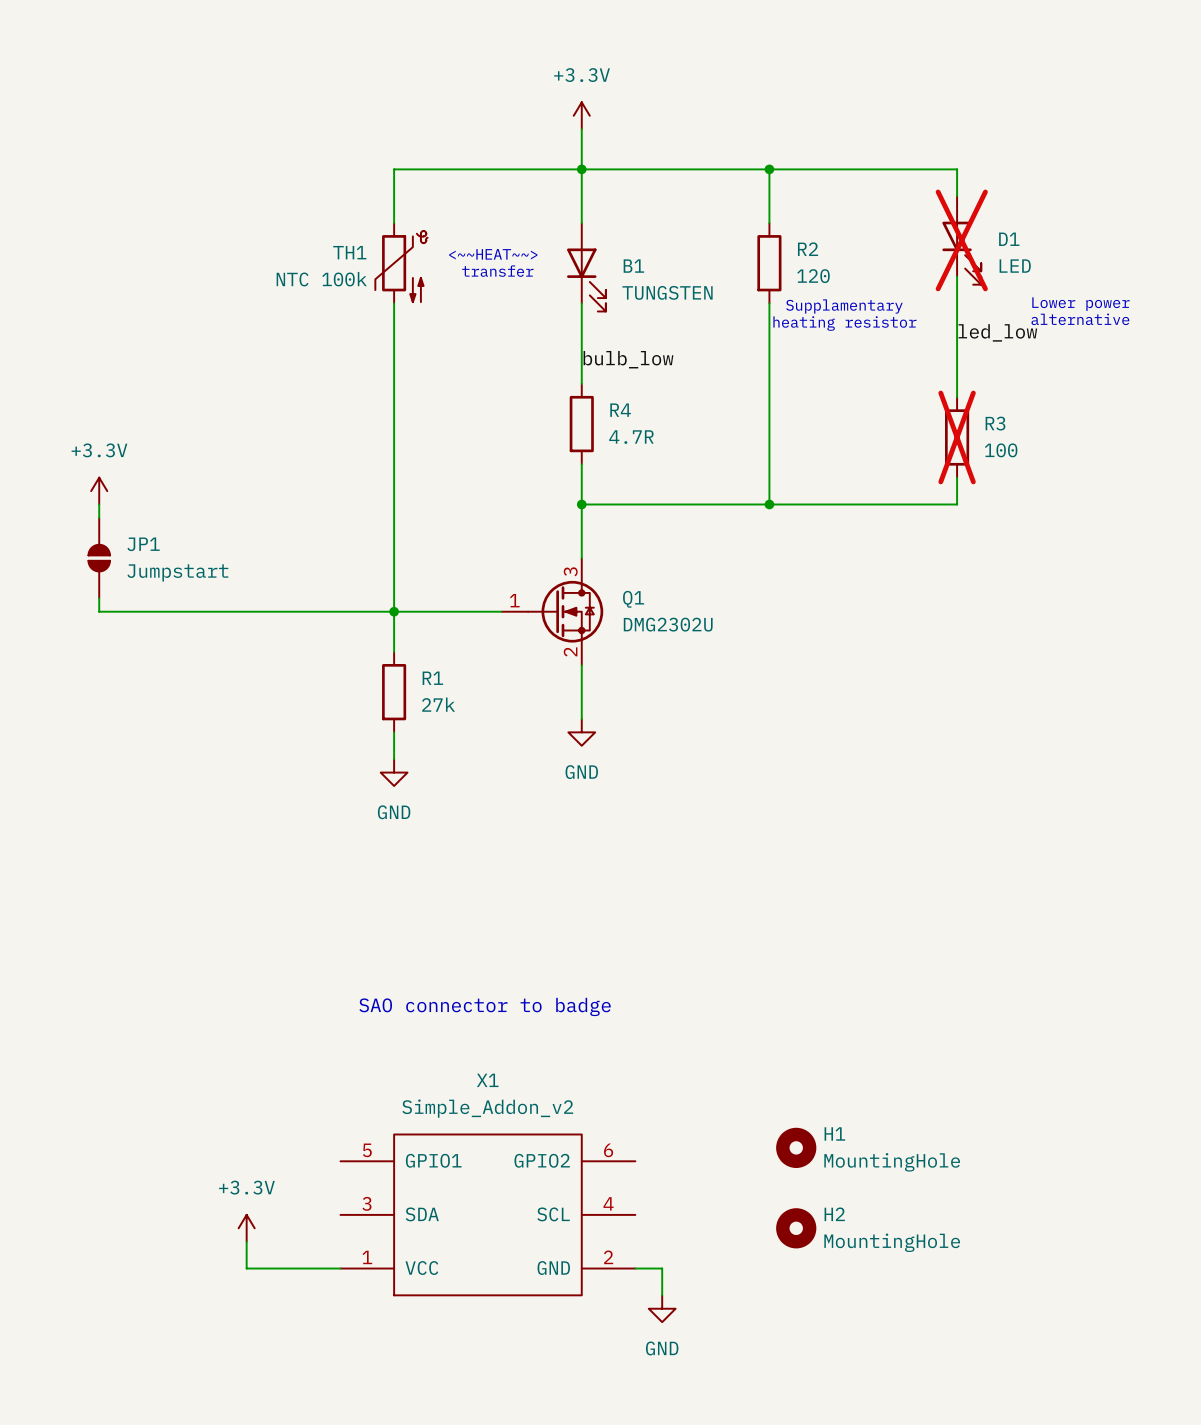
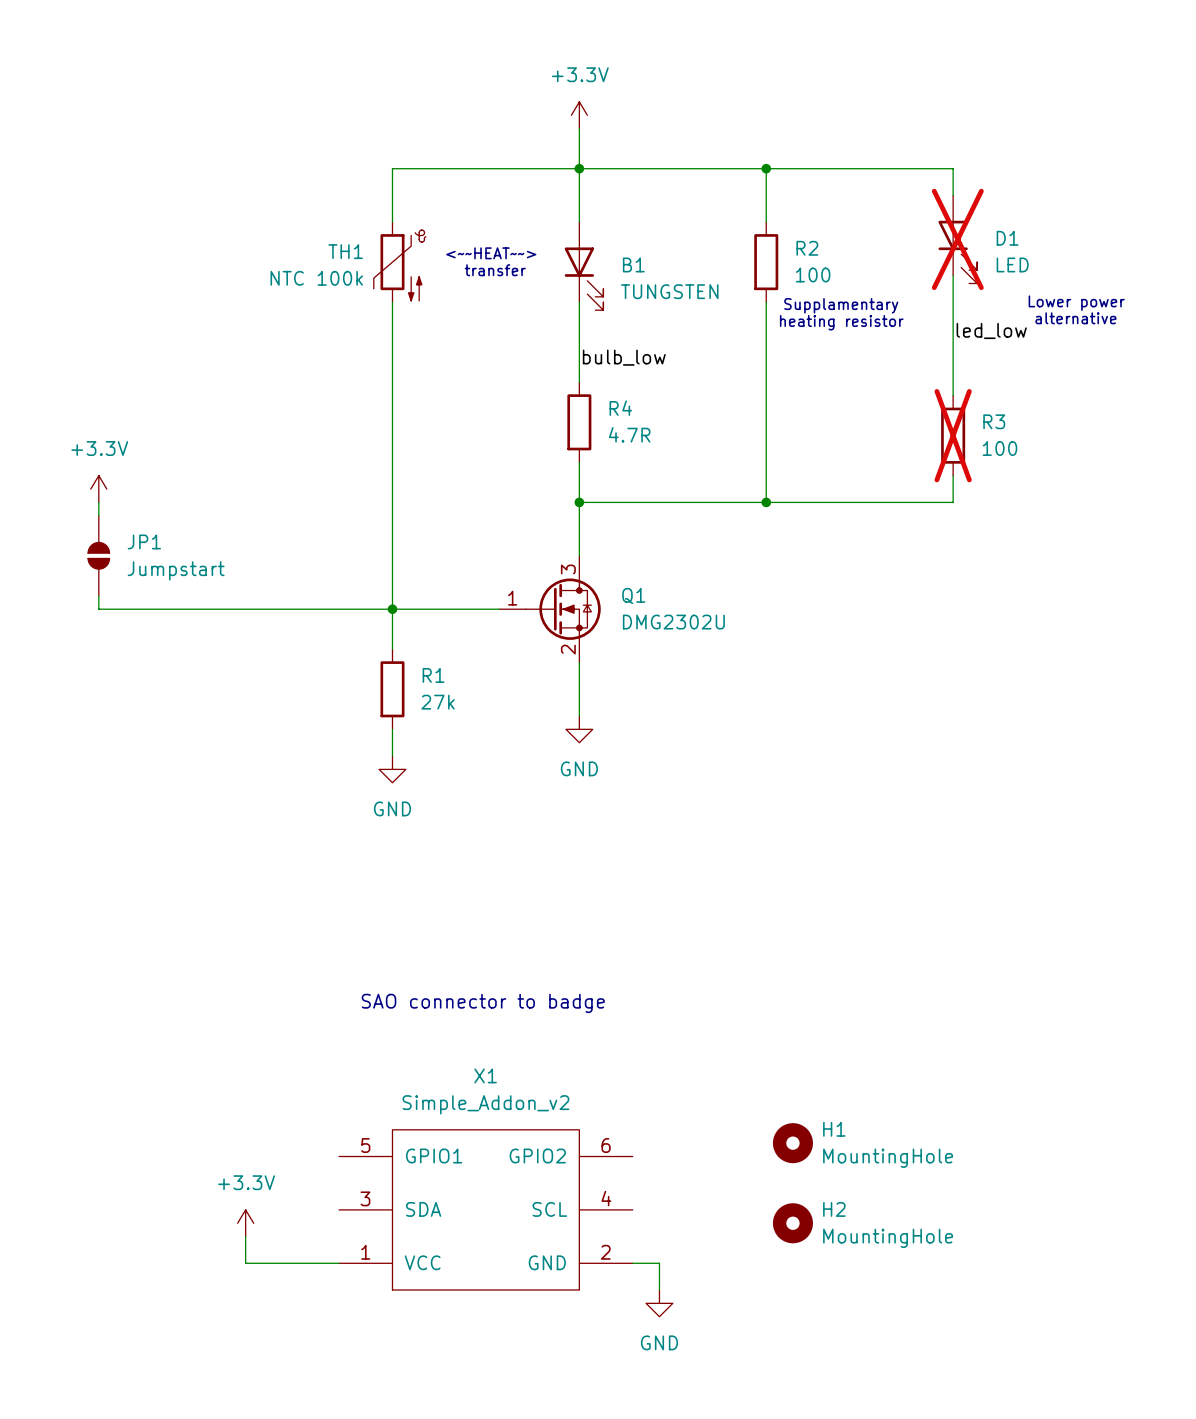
R2 value: 120 (813, 276) -> 100 (813, 274)

